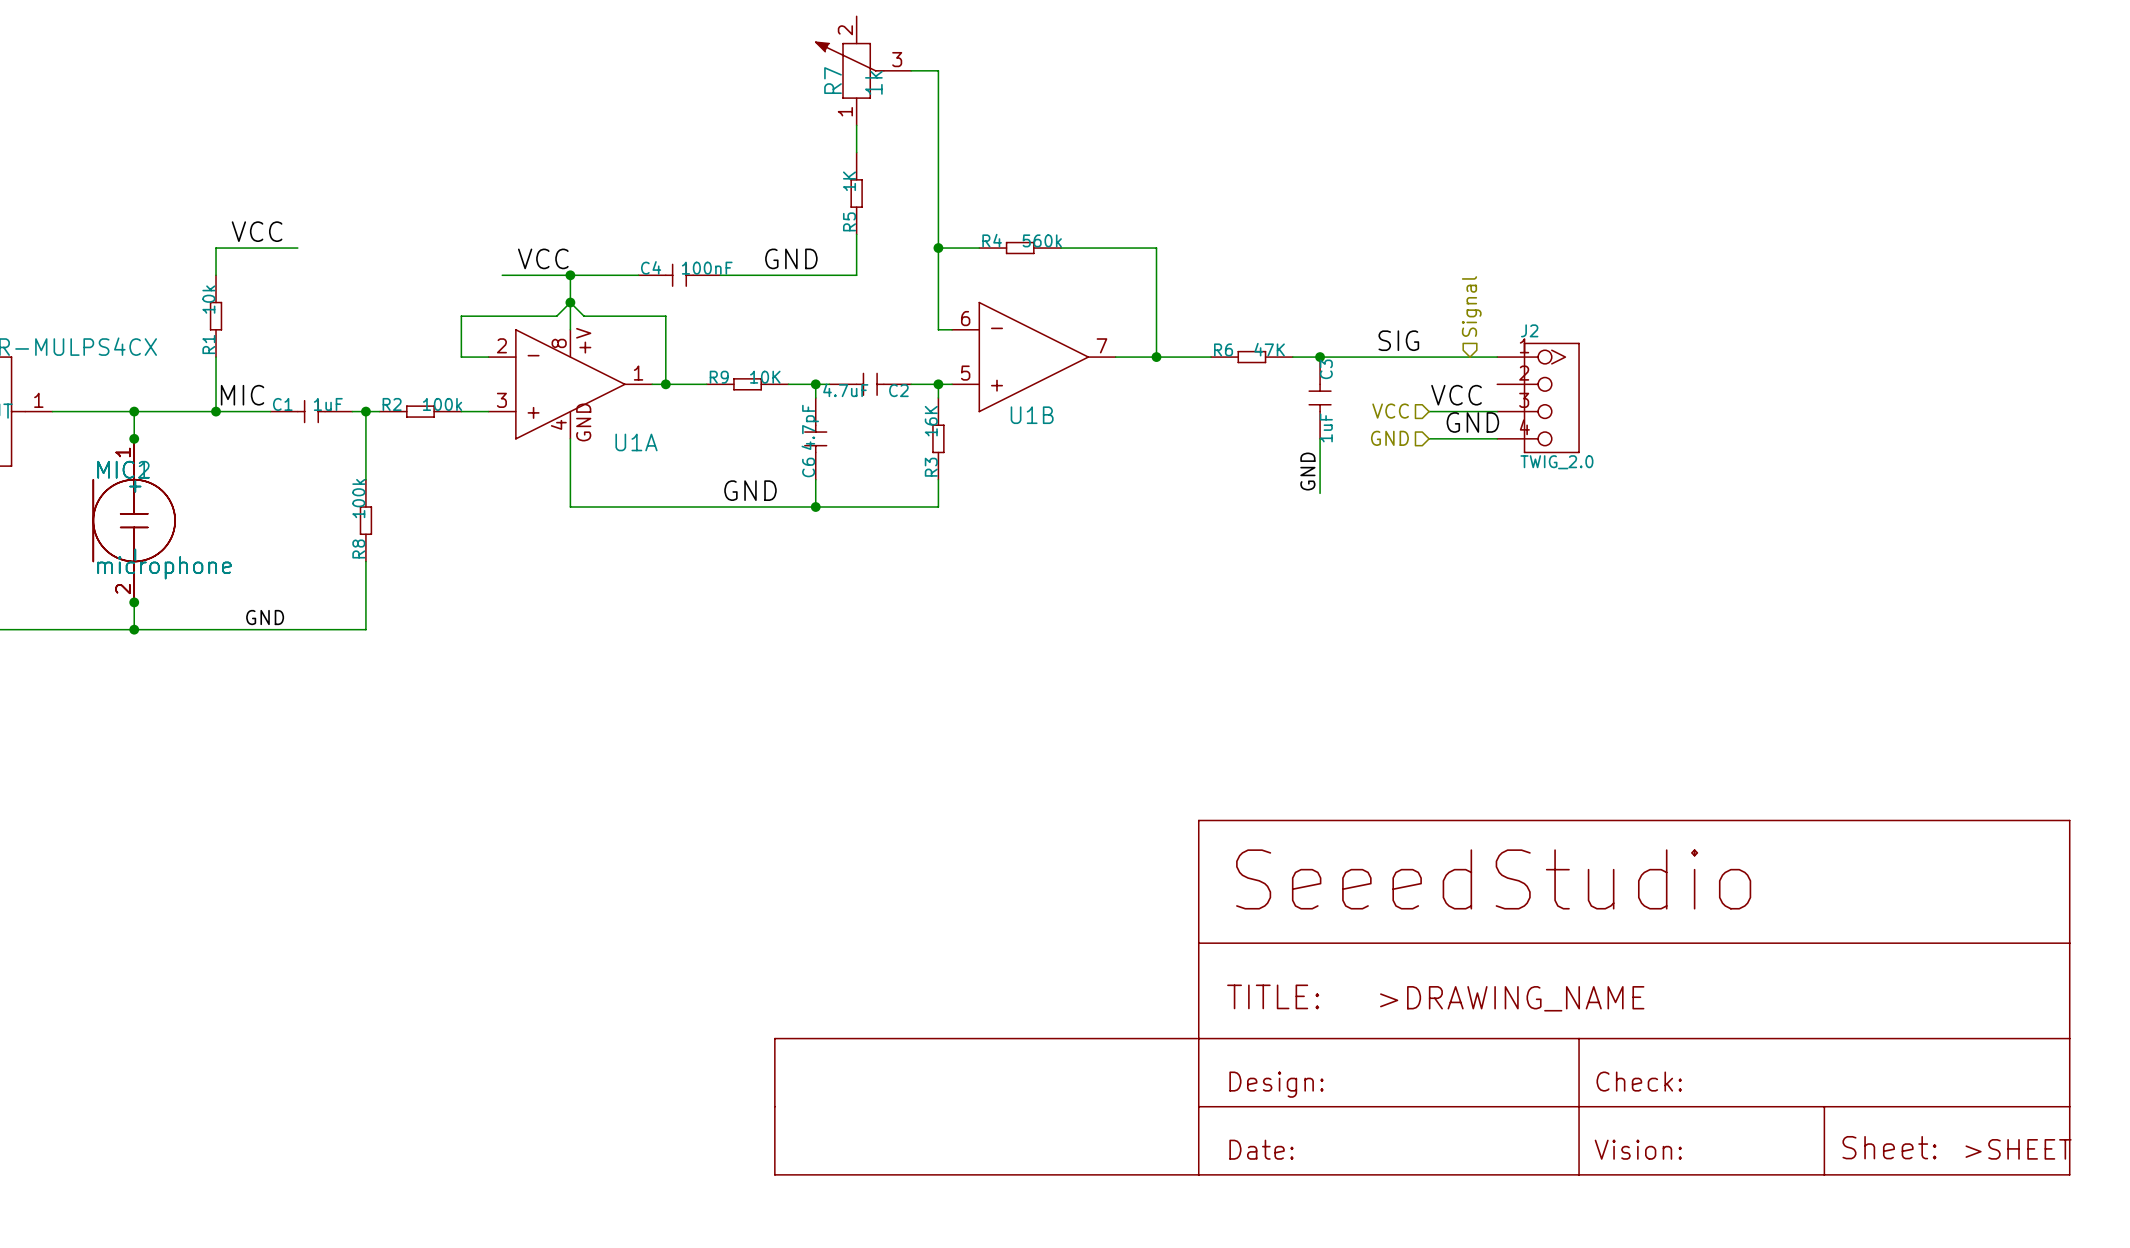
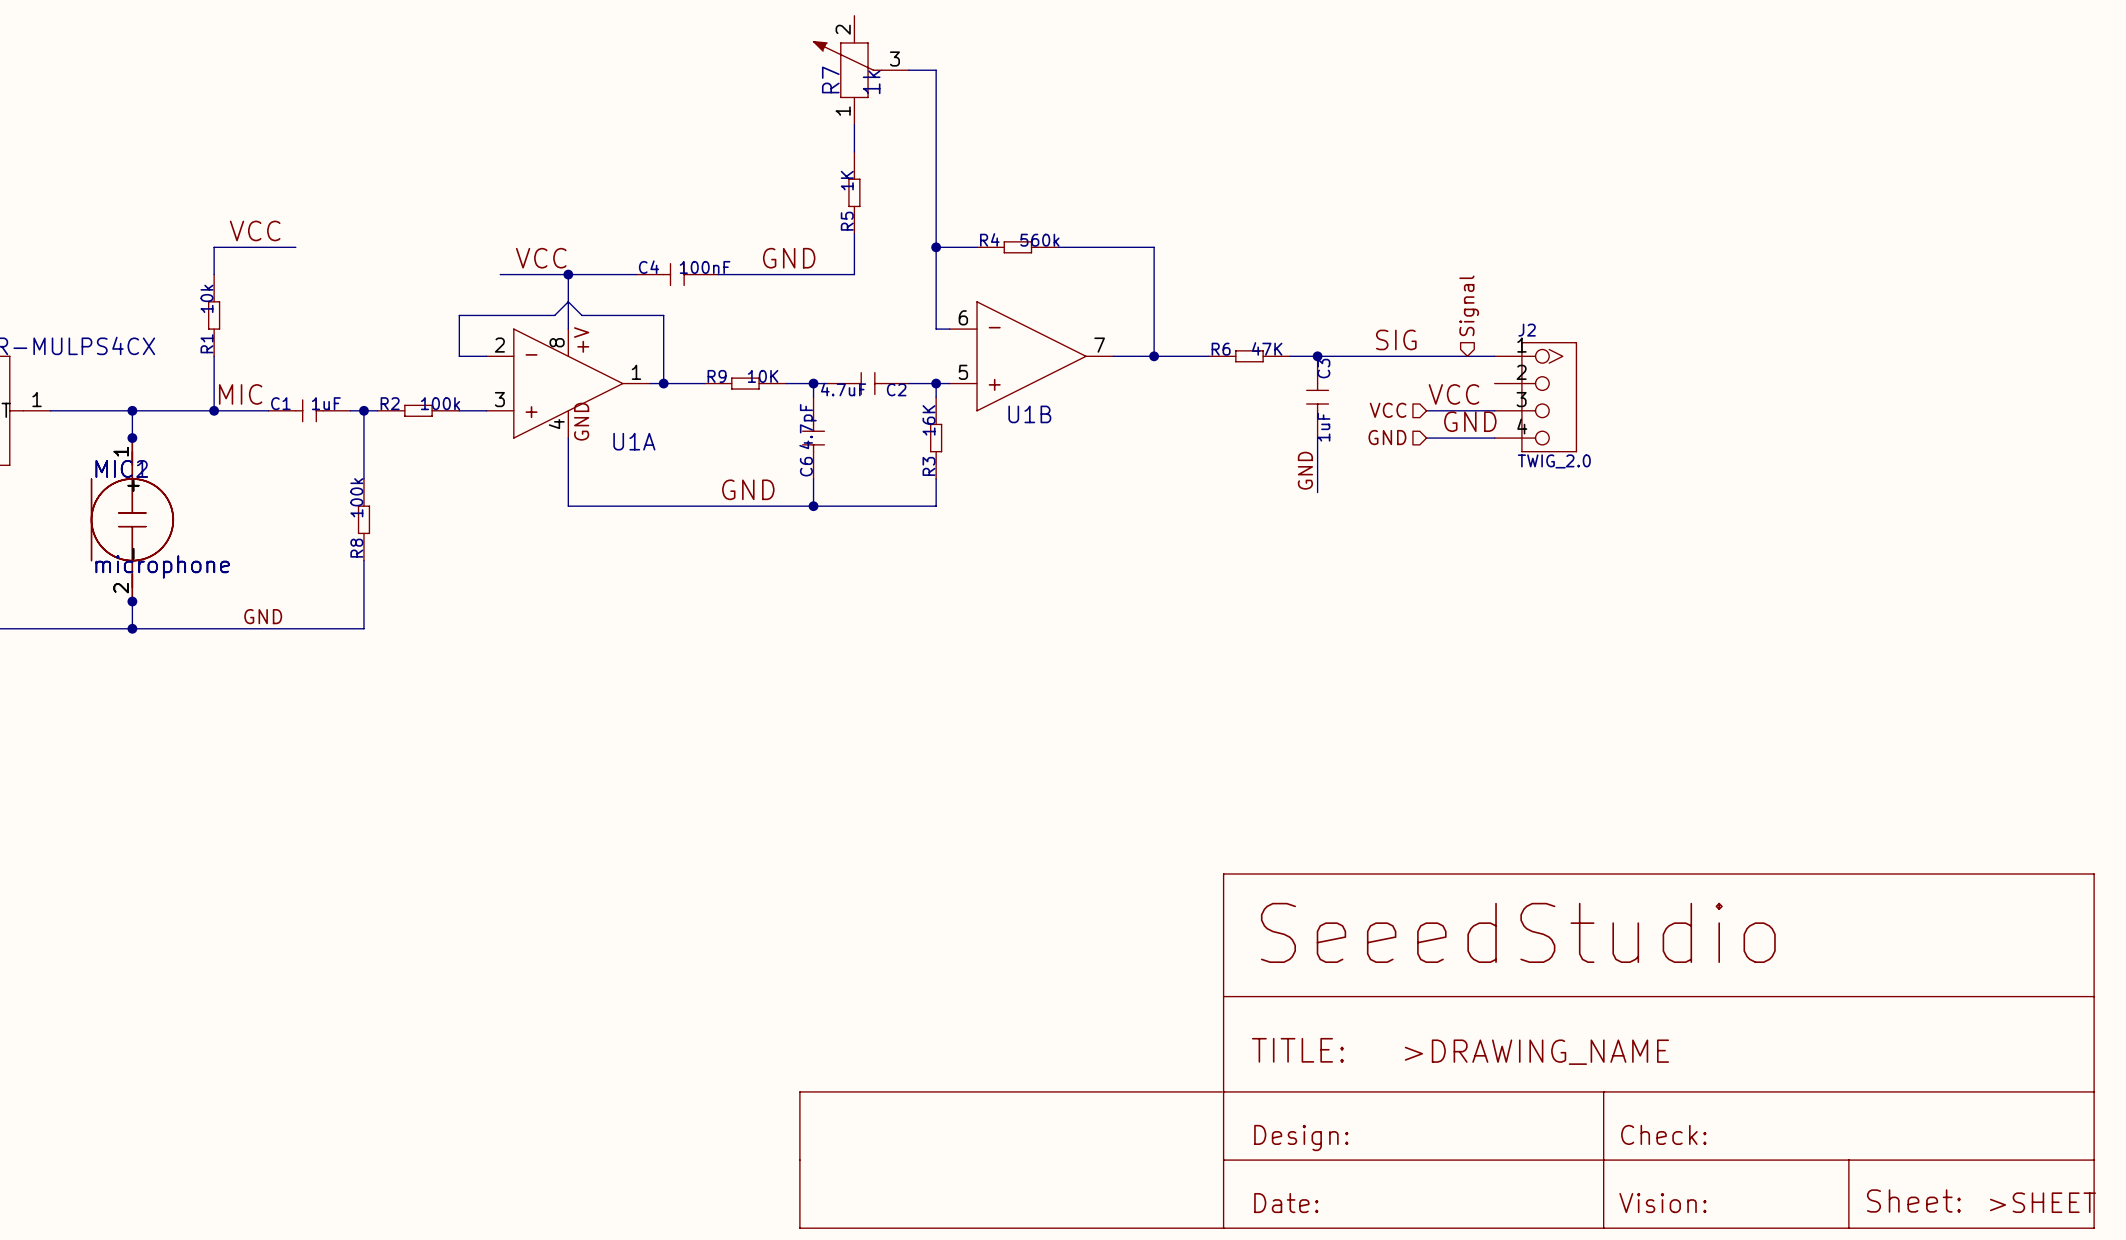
junction: (570, 302) -> none
power symbol position: (1422, 997) -> (1447, 1051)

